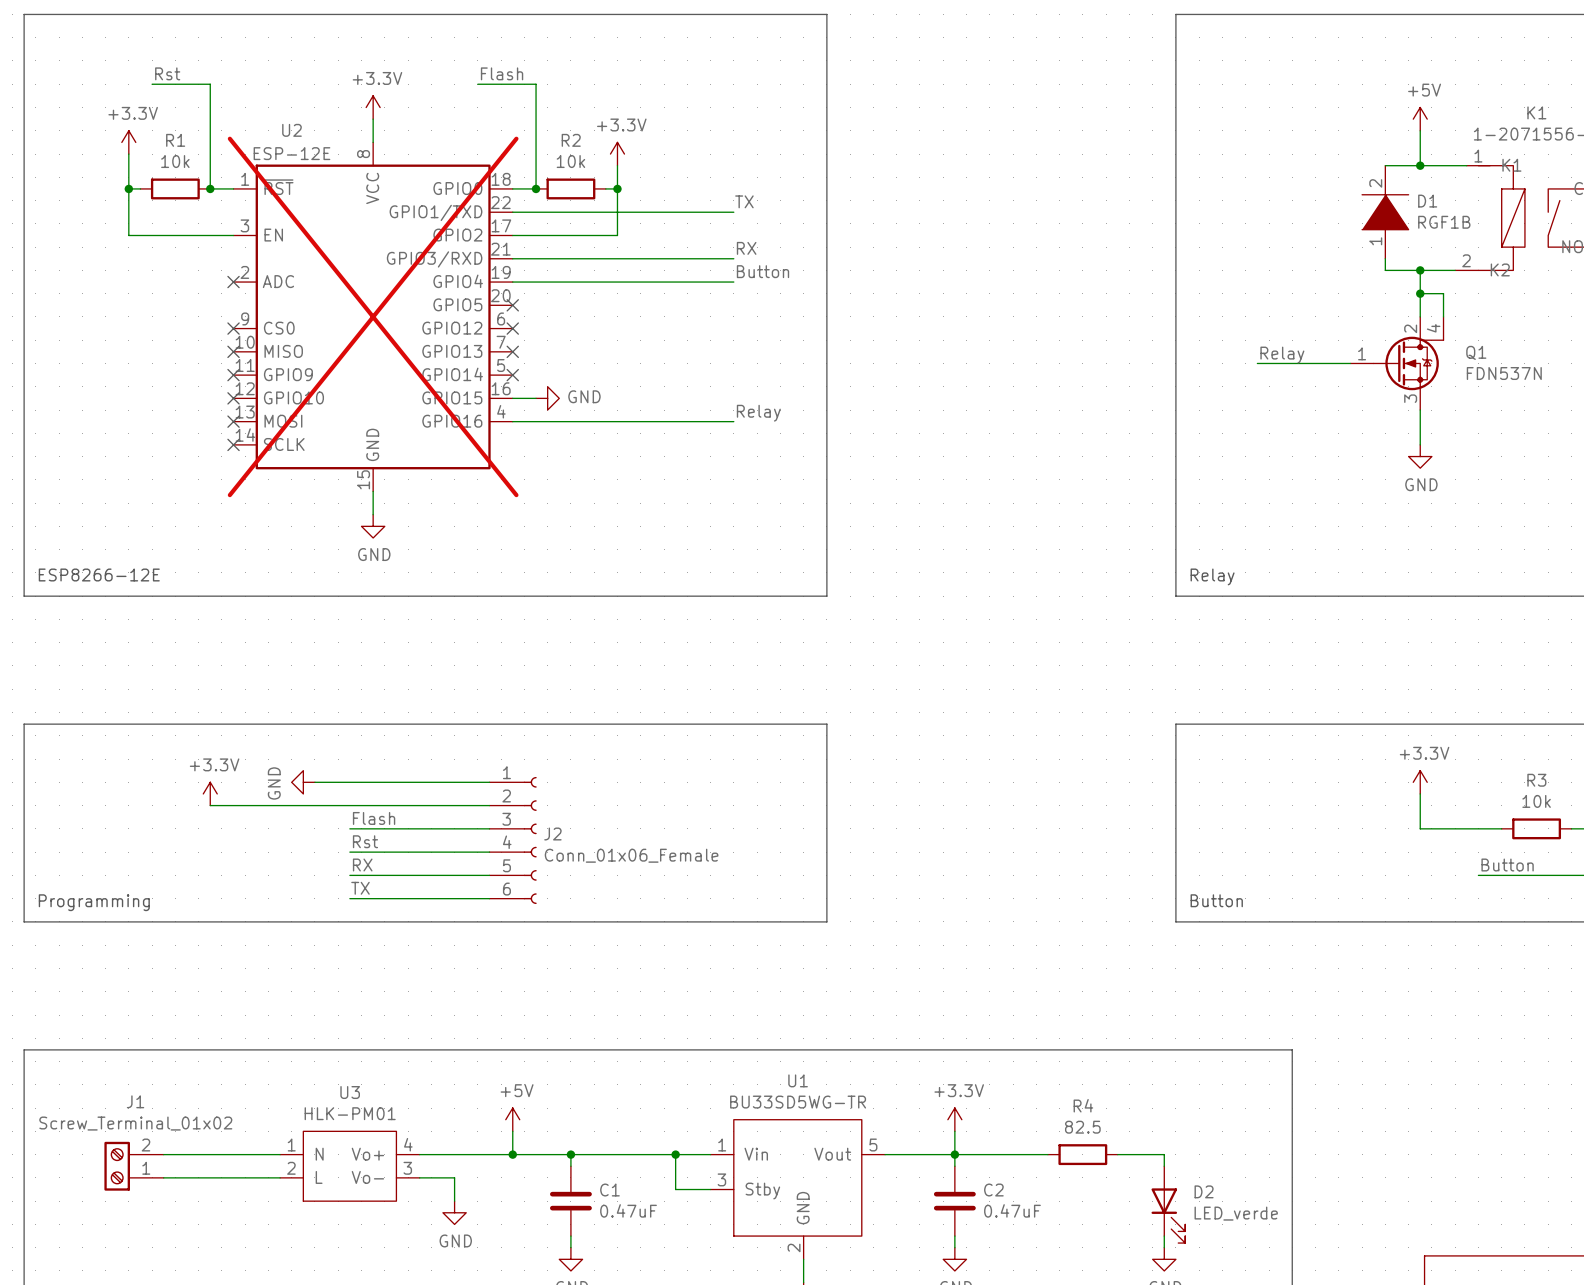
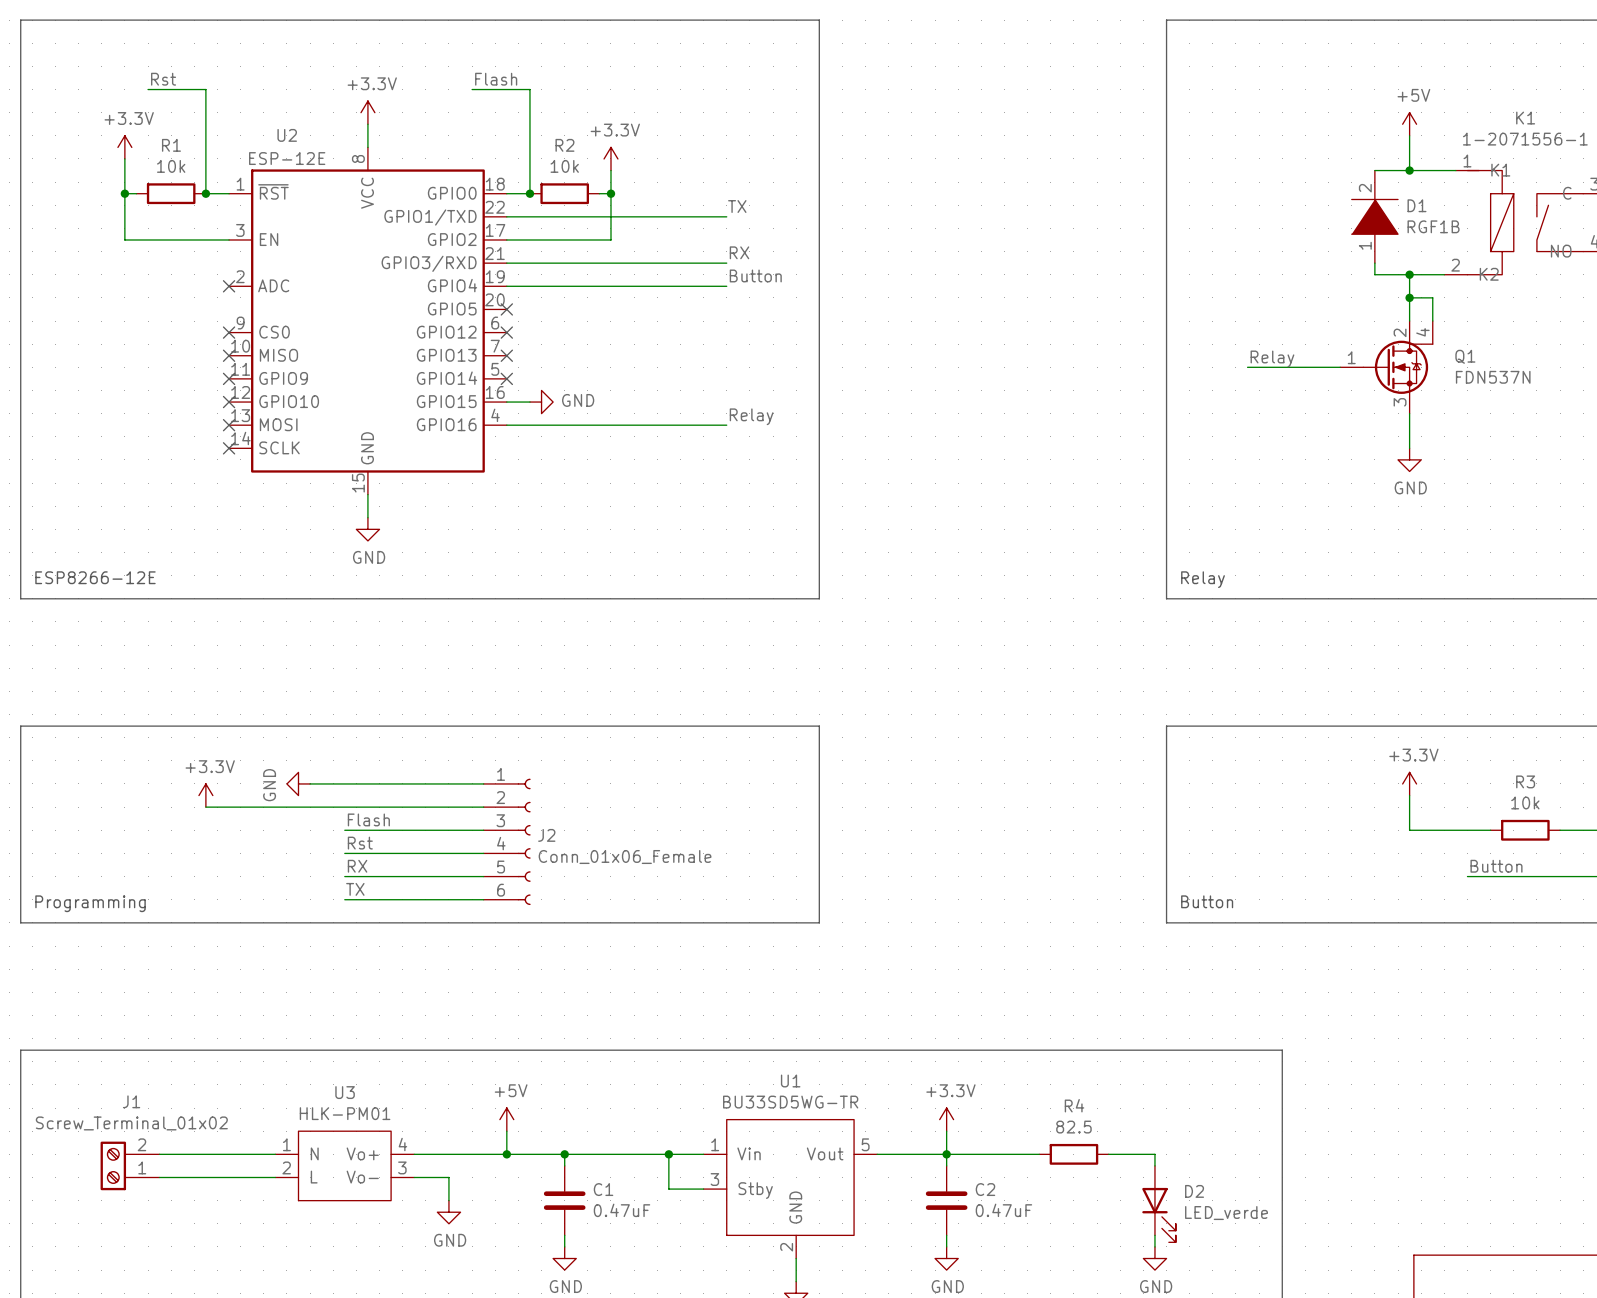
U2 do-not-place cross: (373, 316) -> none

